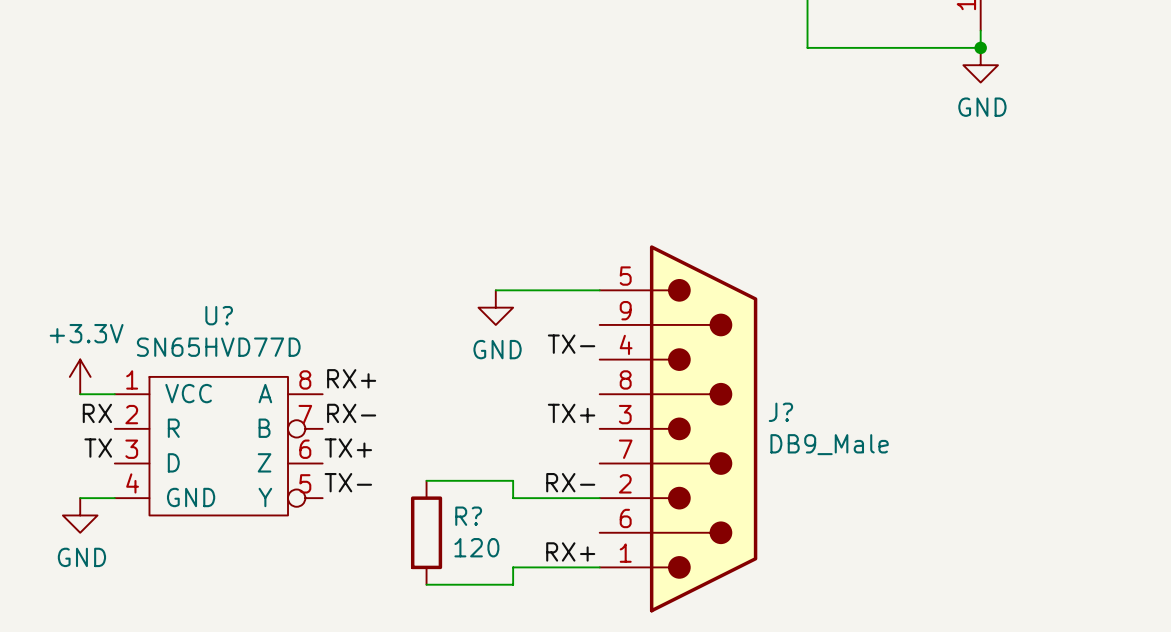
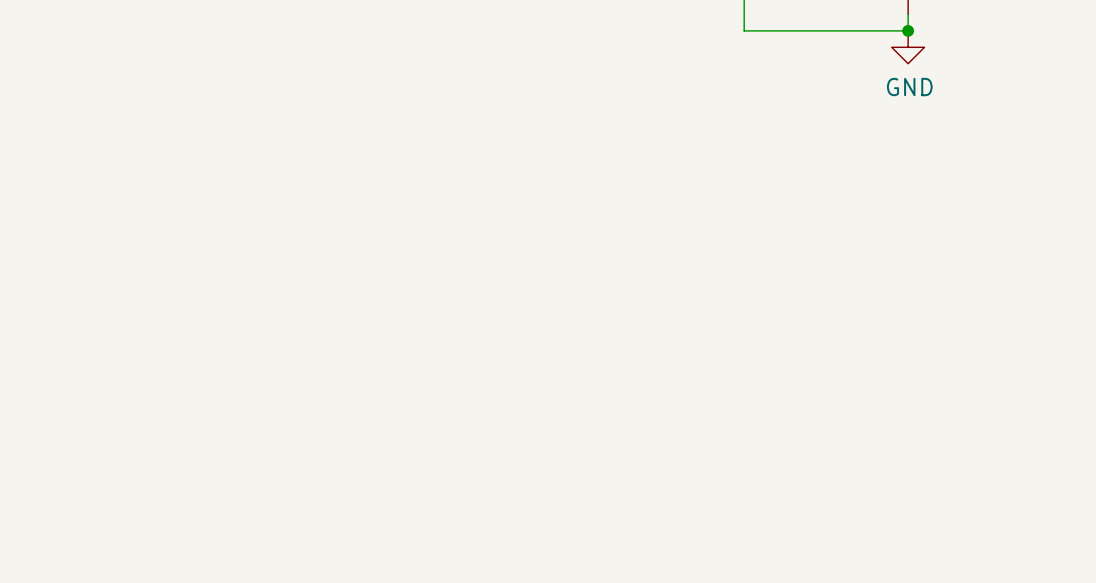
wire: (495, 290) (599, 290) -> none
power symbol: GND (495, 307) -> none
label: TX- (571, 344) -> none
power symbol: +3.3V (80, 376) -> none
label: RX+ (351, 378) -> none
wire: (80, 394) (114, 394) -> none
label: RX (97, 413) -> none
label: RX- (351, 413) -> none
label: TX+ (571, 413) -> none
J?: DB9_Male (678, 428) -> none
U?: SN65HVD77D (218, 446) -> none
label: TX (98, 448) -> none
label: TX+ (348, 448) -> none
wire: (426, 480) (513, 480) (513, 498) (599, 498) -> none
label: TX- (348, 482) -> none
label: RX- (570, 482) -> none
wire: (80, 498) (114, 498) -> none
power symbol: GND (80, 515) -> none
R?: 120 (426, 532) -> none
label: RX+ (570, 551) -> none
wire: (599, 567) (513, 567) (513, 584) (426, 584) -> none

